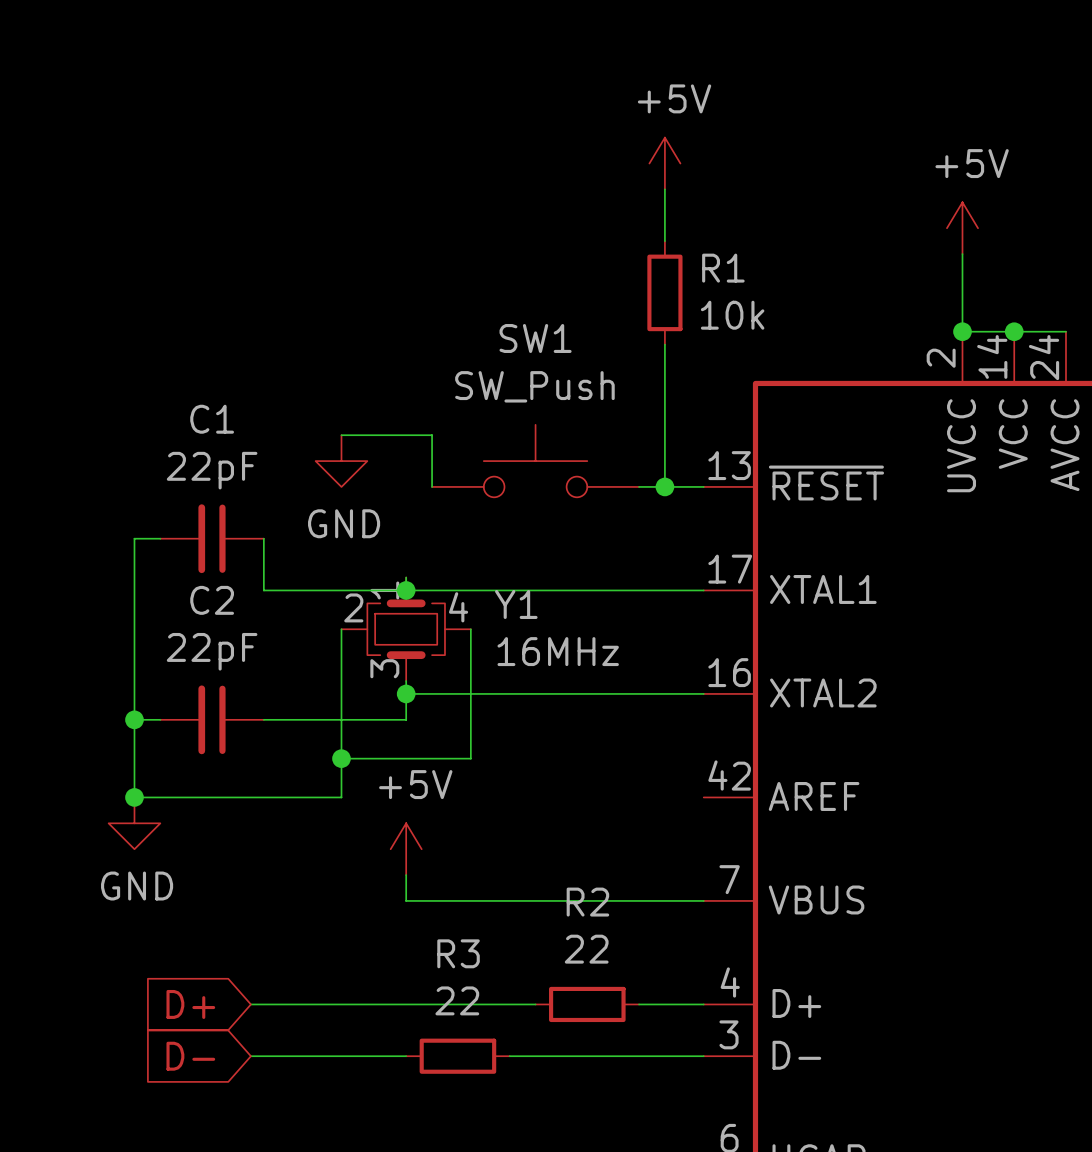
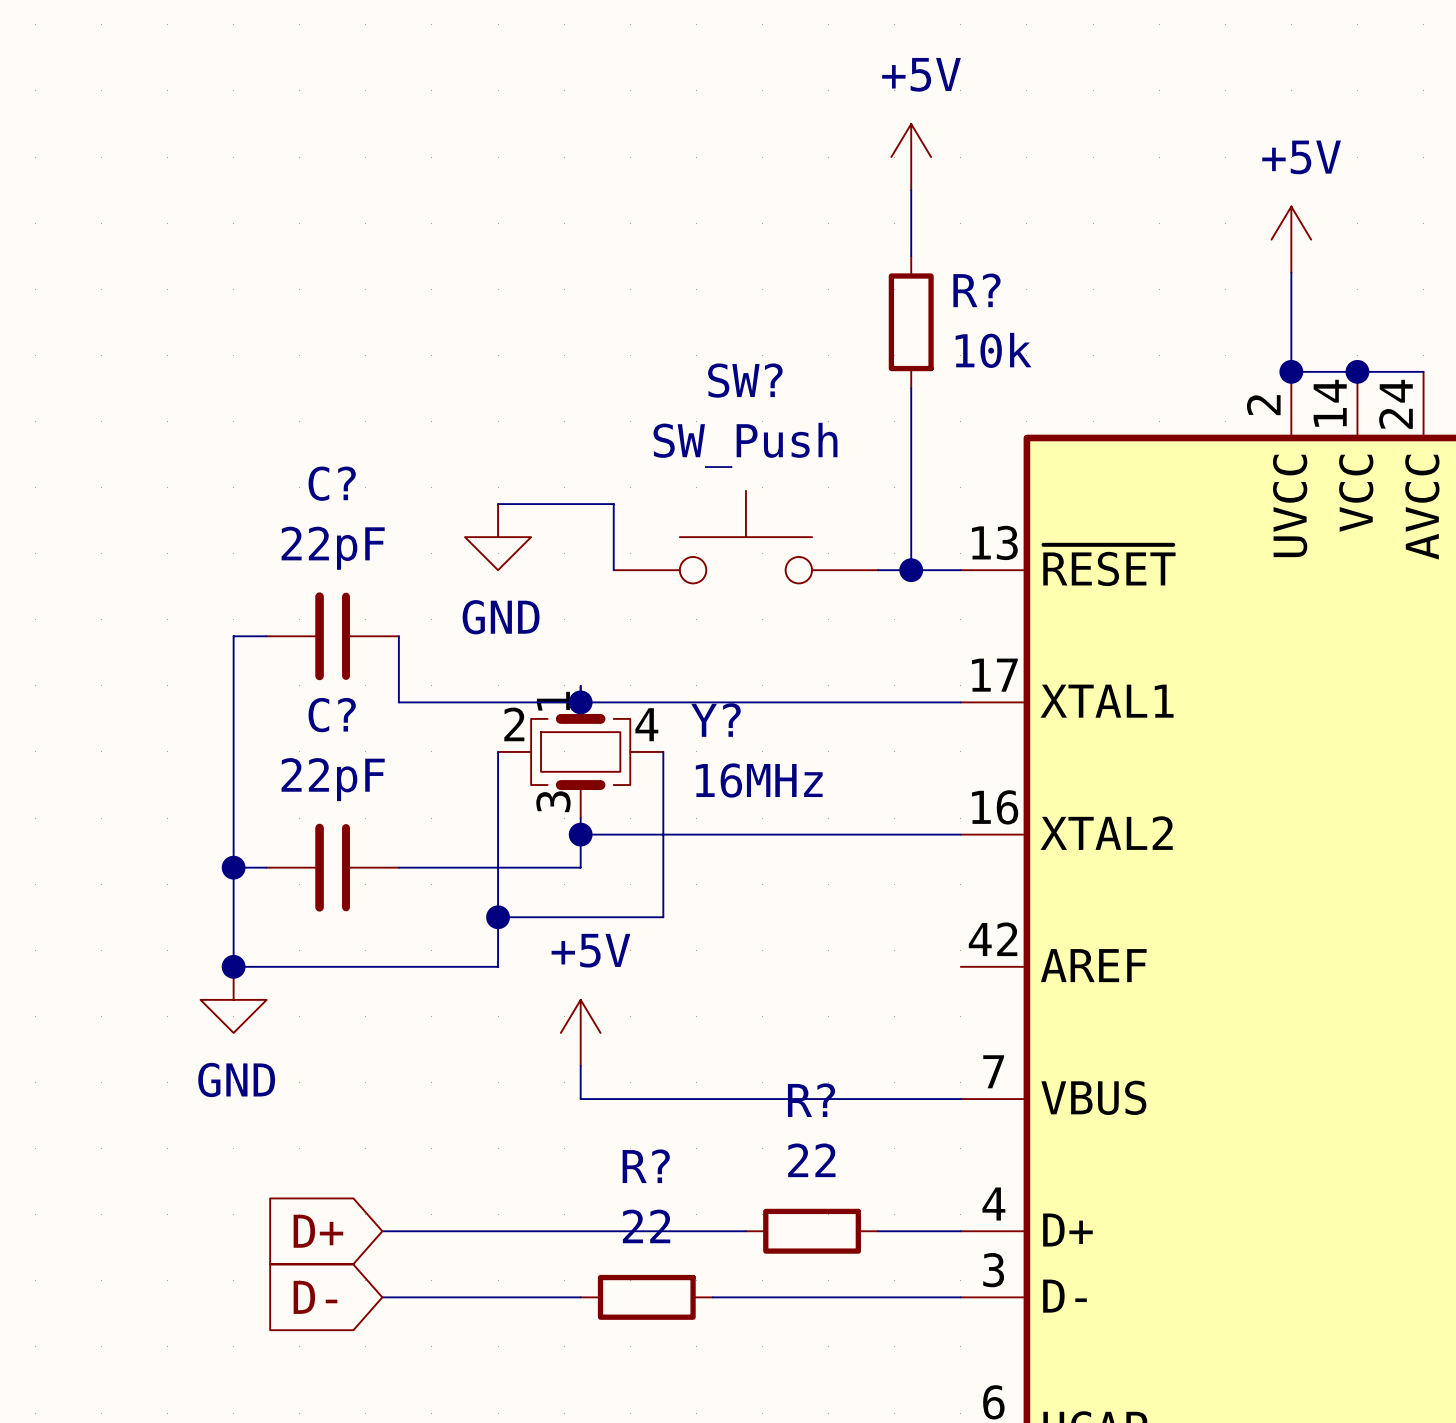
R1 name: R1 (723, 268) -> R? (976, 290)
SW1 name: SW1 (535, 338) -> SW? (745, 380)
C1 name: C1 (212, 419) -> C? (332, 483)
C2 name: C2 (212, 600) -> C? (332, 715)
Y1 name: Y1 (516, 604) -> Y? (715, 720)
R2 name: R2 (587, 902) -> R? (811, 1100)
R3 name: R3 (458, 953) -> R? (646, 1166)

